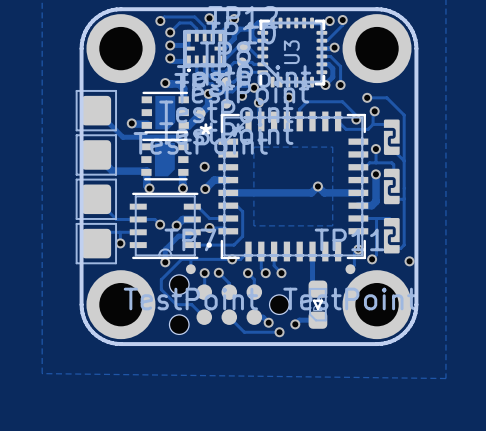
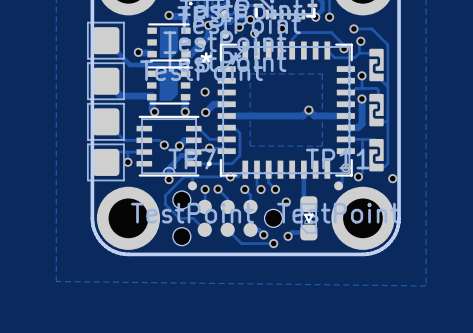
via: none -> (286, 202)

